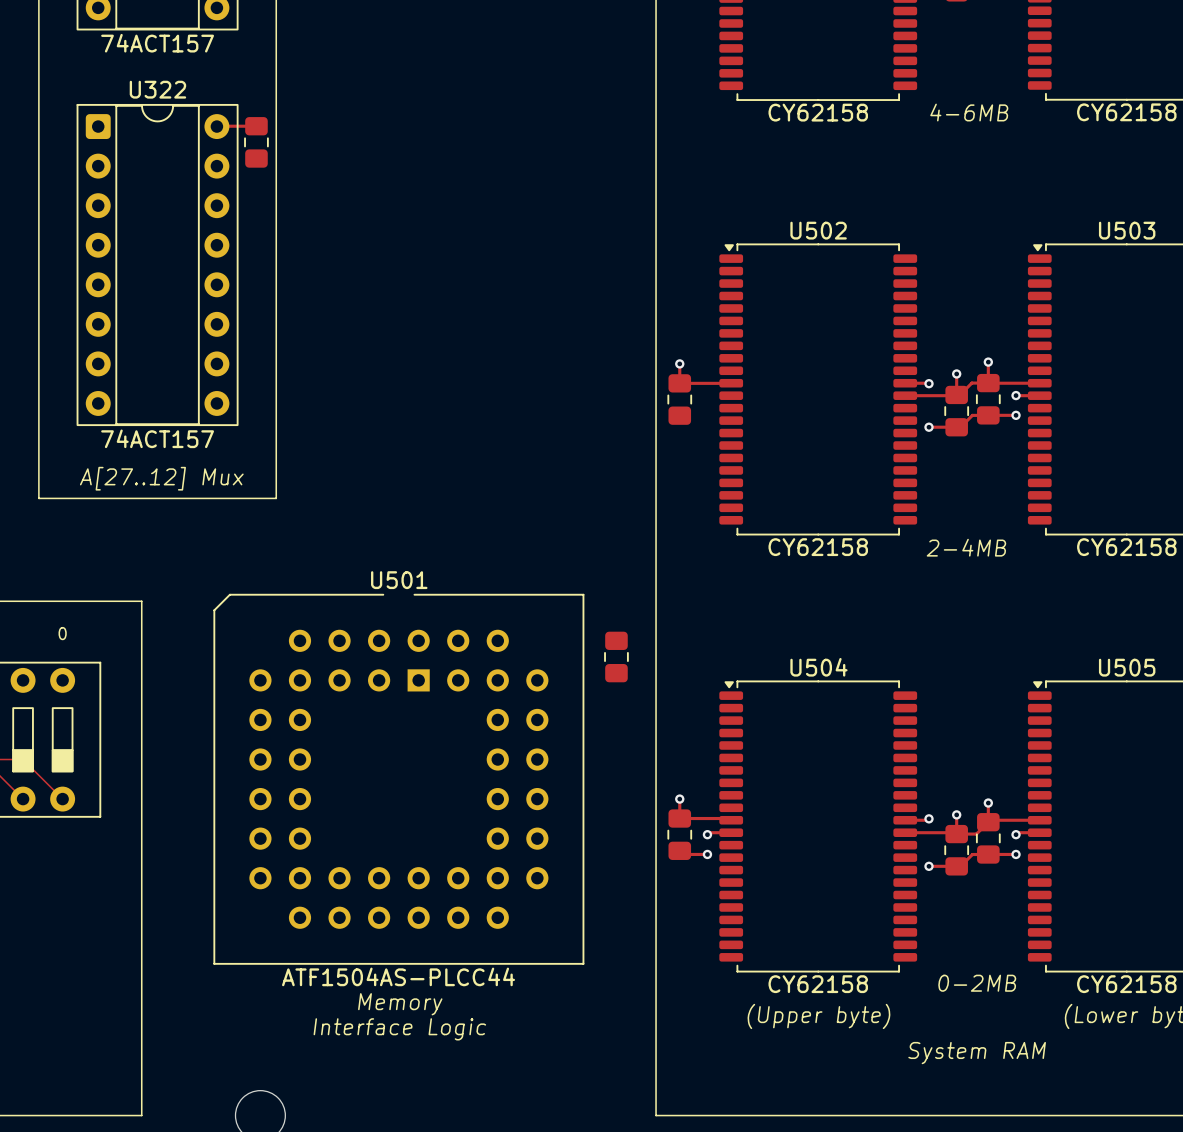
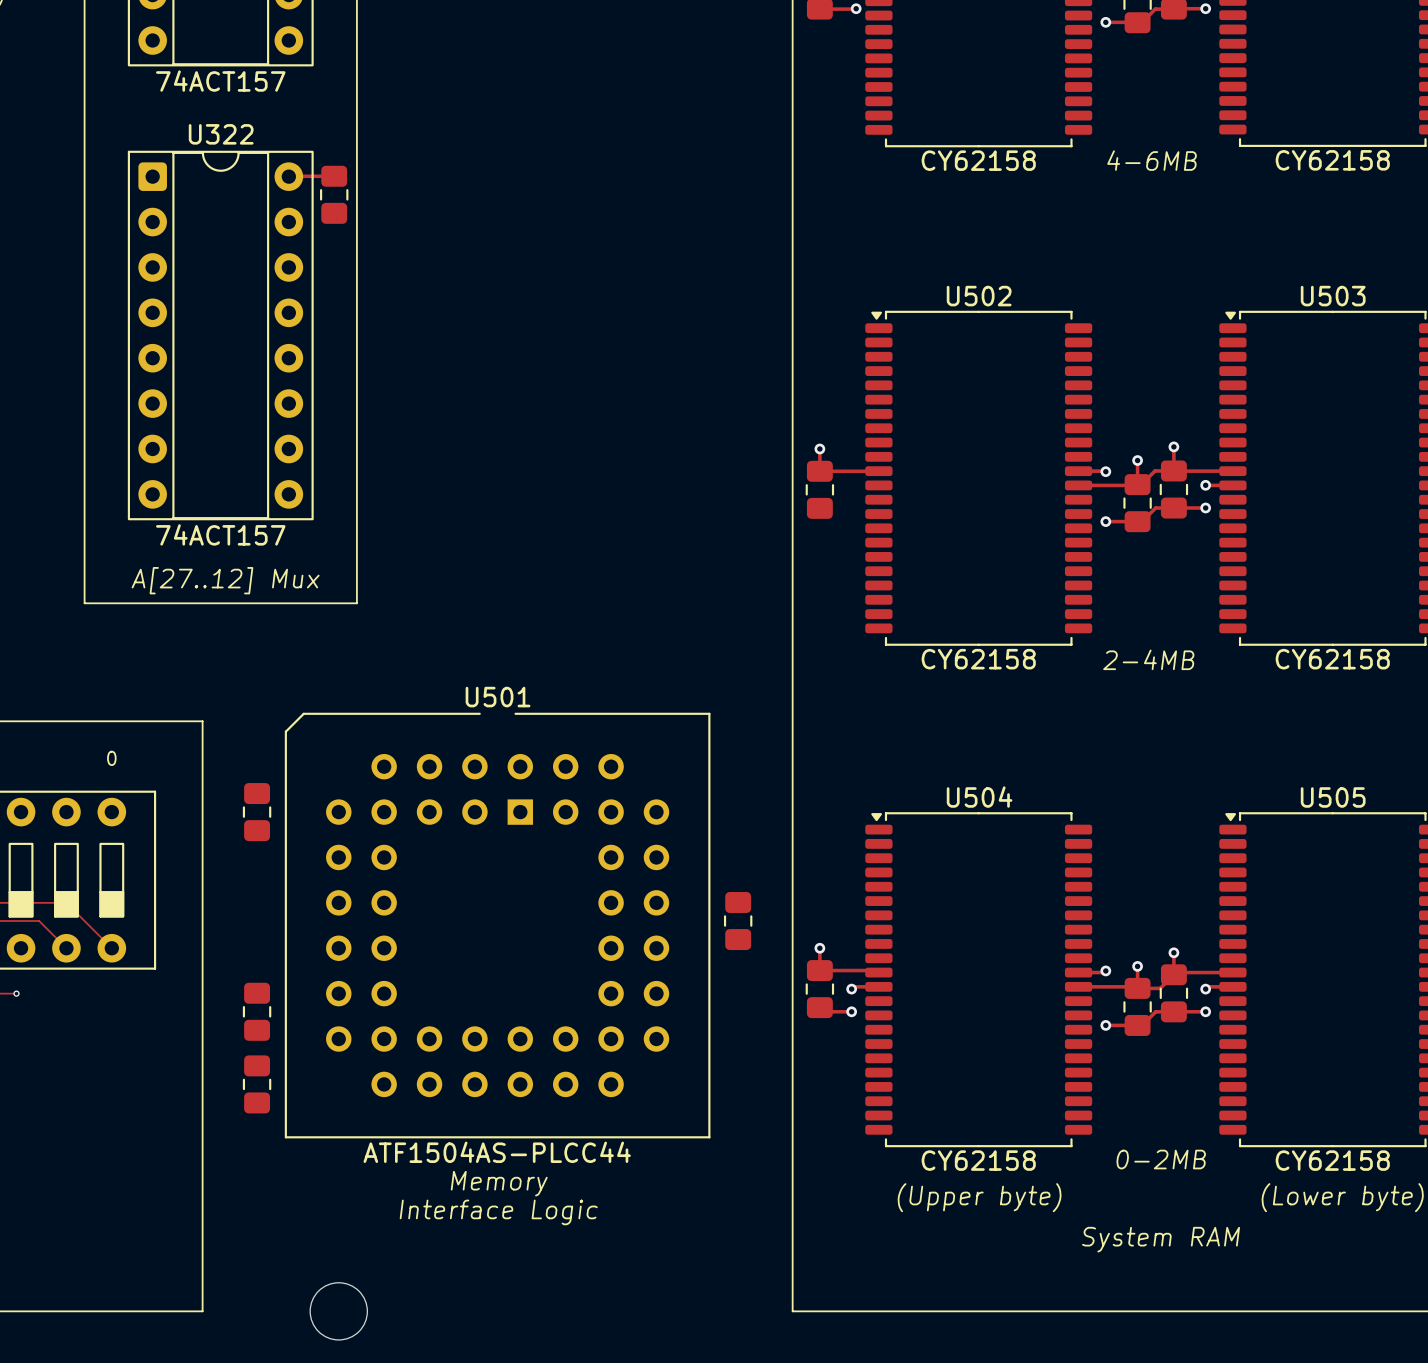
part position: (616, 656) -> (738, 921)
part: none -> (257, 812)
part: none -> (257, 1011)
part: none -> (257, 1084)

